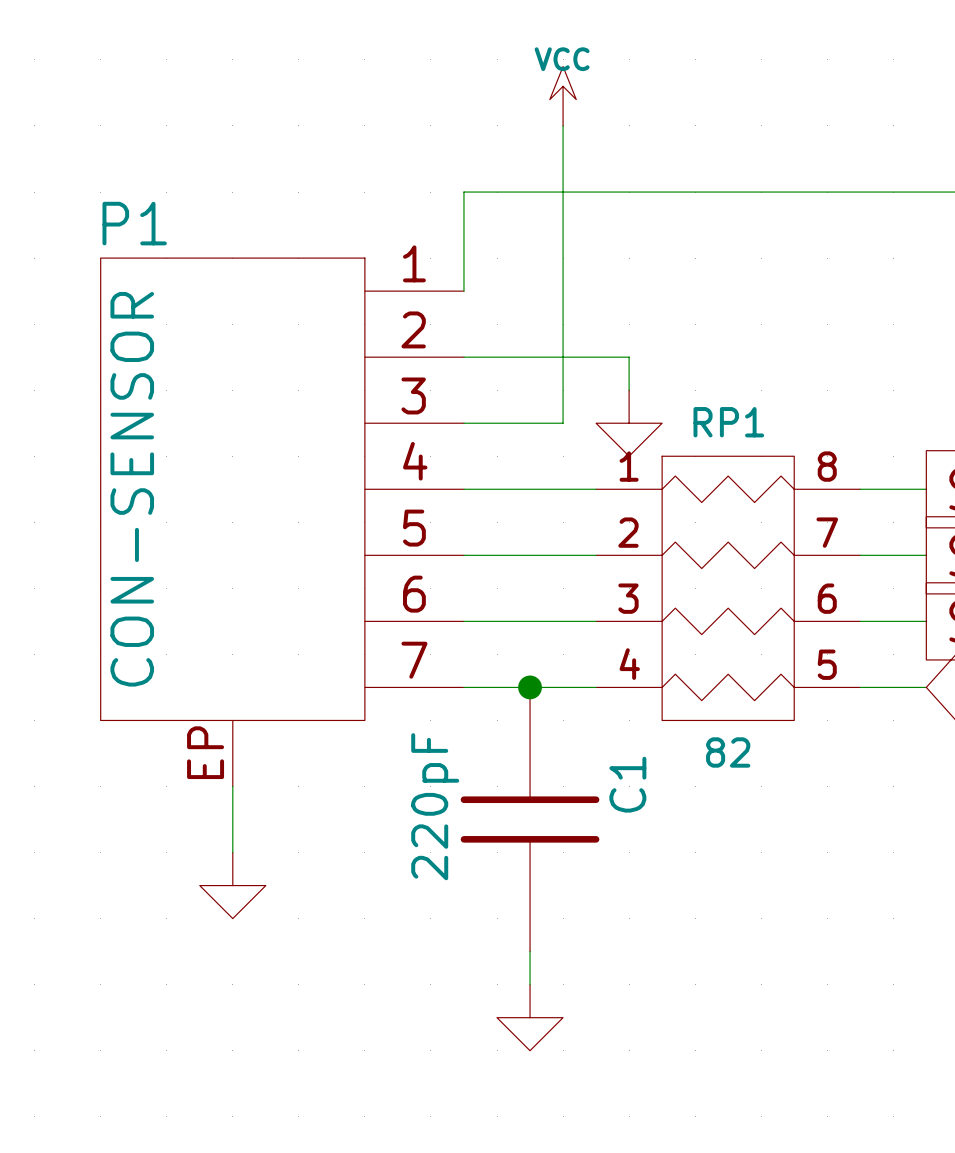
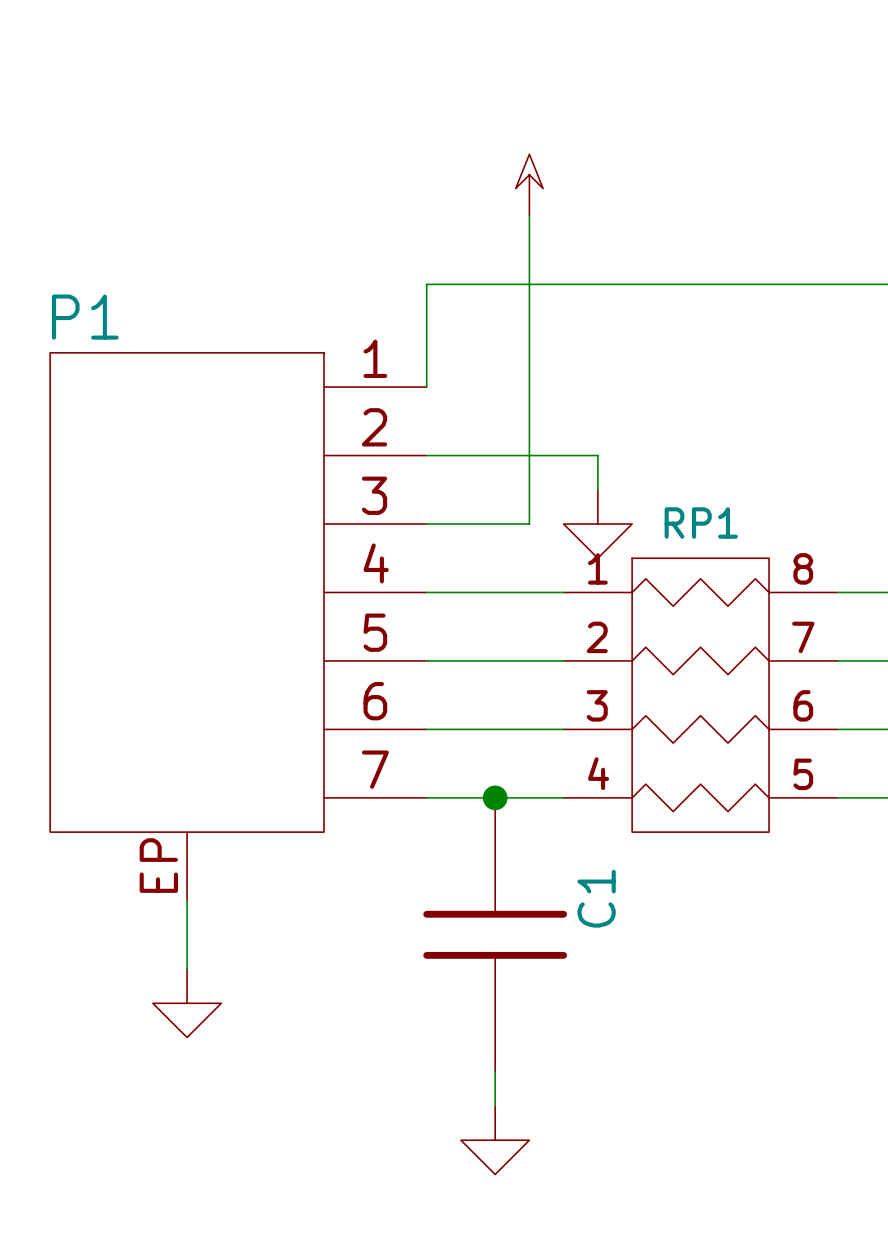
power symbol text: VCC (562, 59) -> none
P1 value: CON-SENSOR (132, 489) -> none
RP1 value: 82 (728, 752) -> none
C1 value: 220pF (435, 806) -> none

